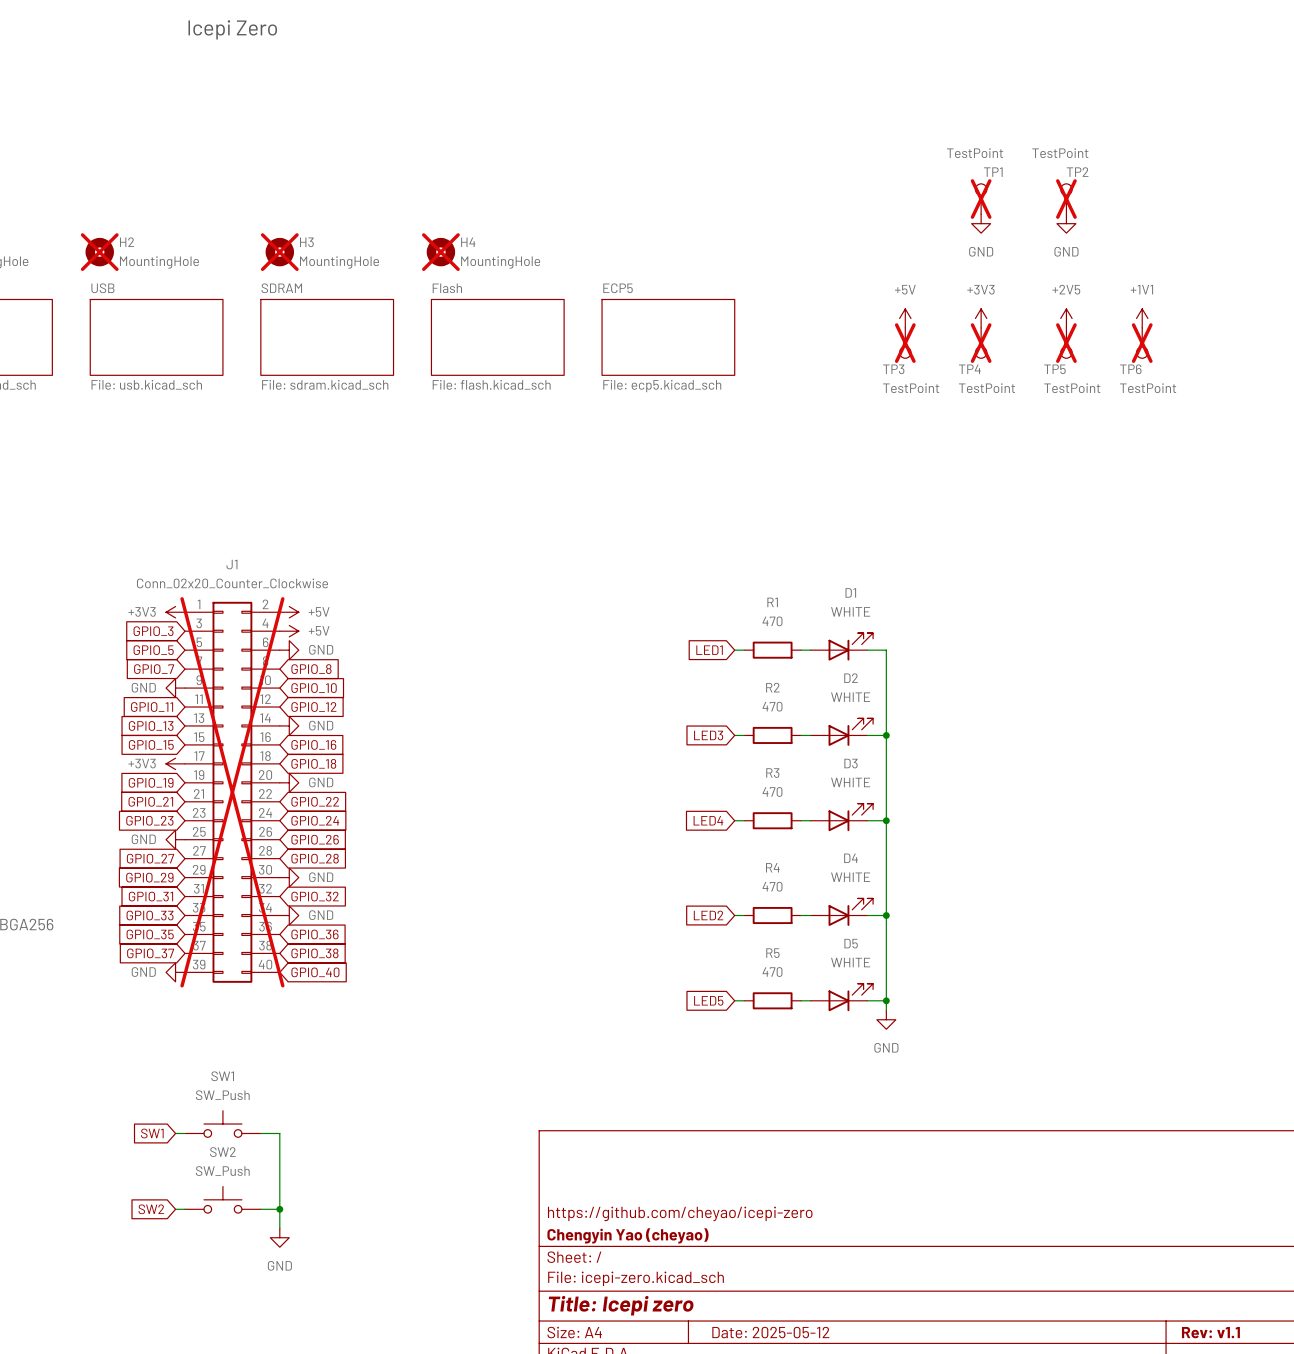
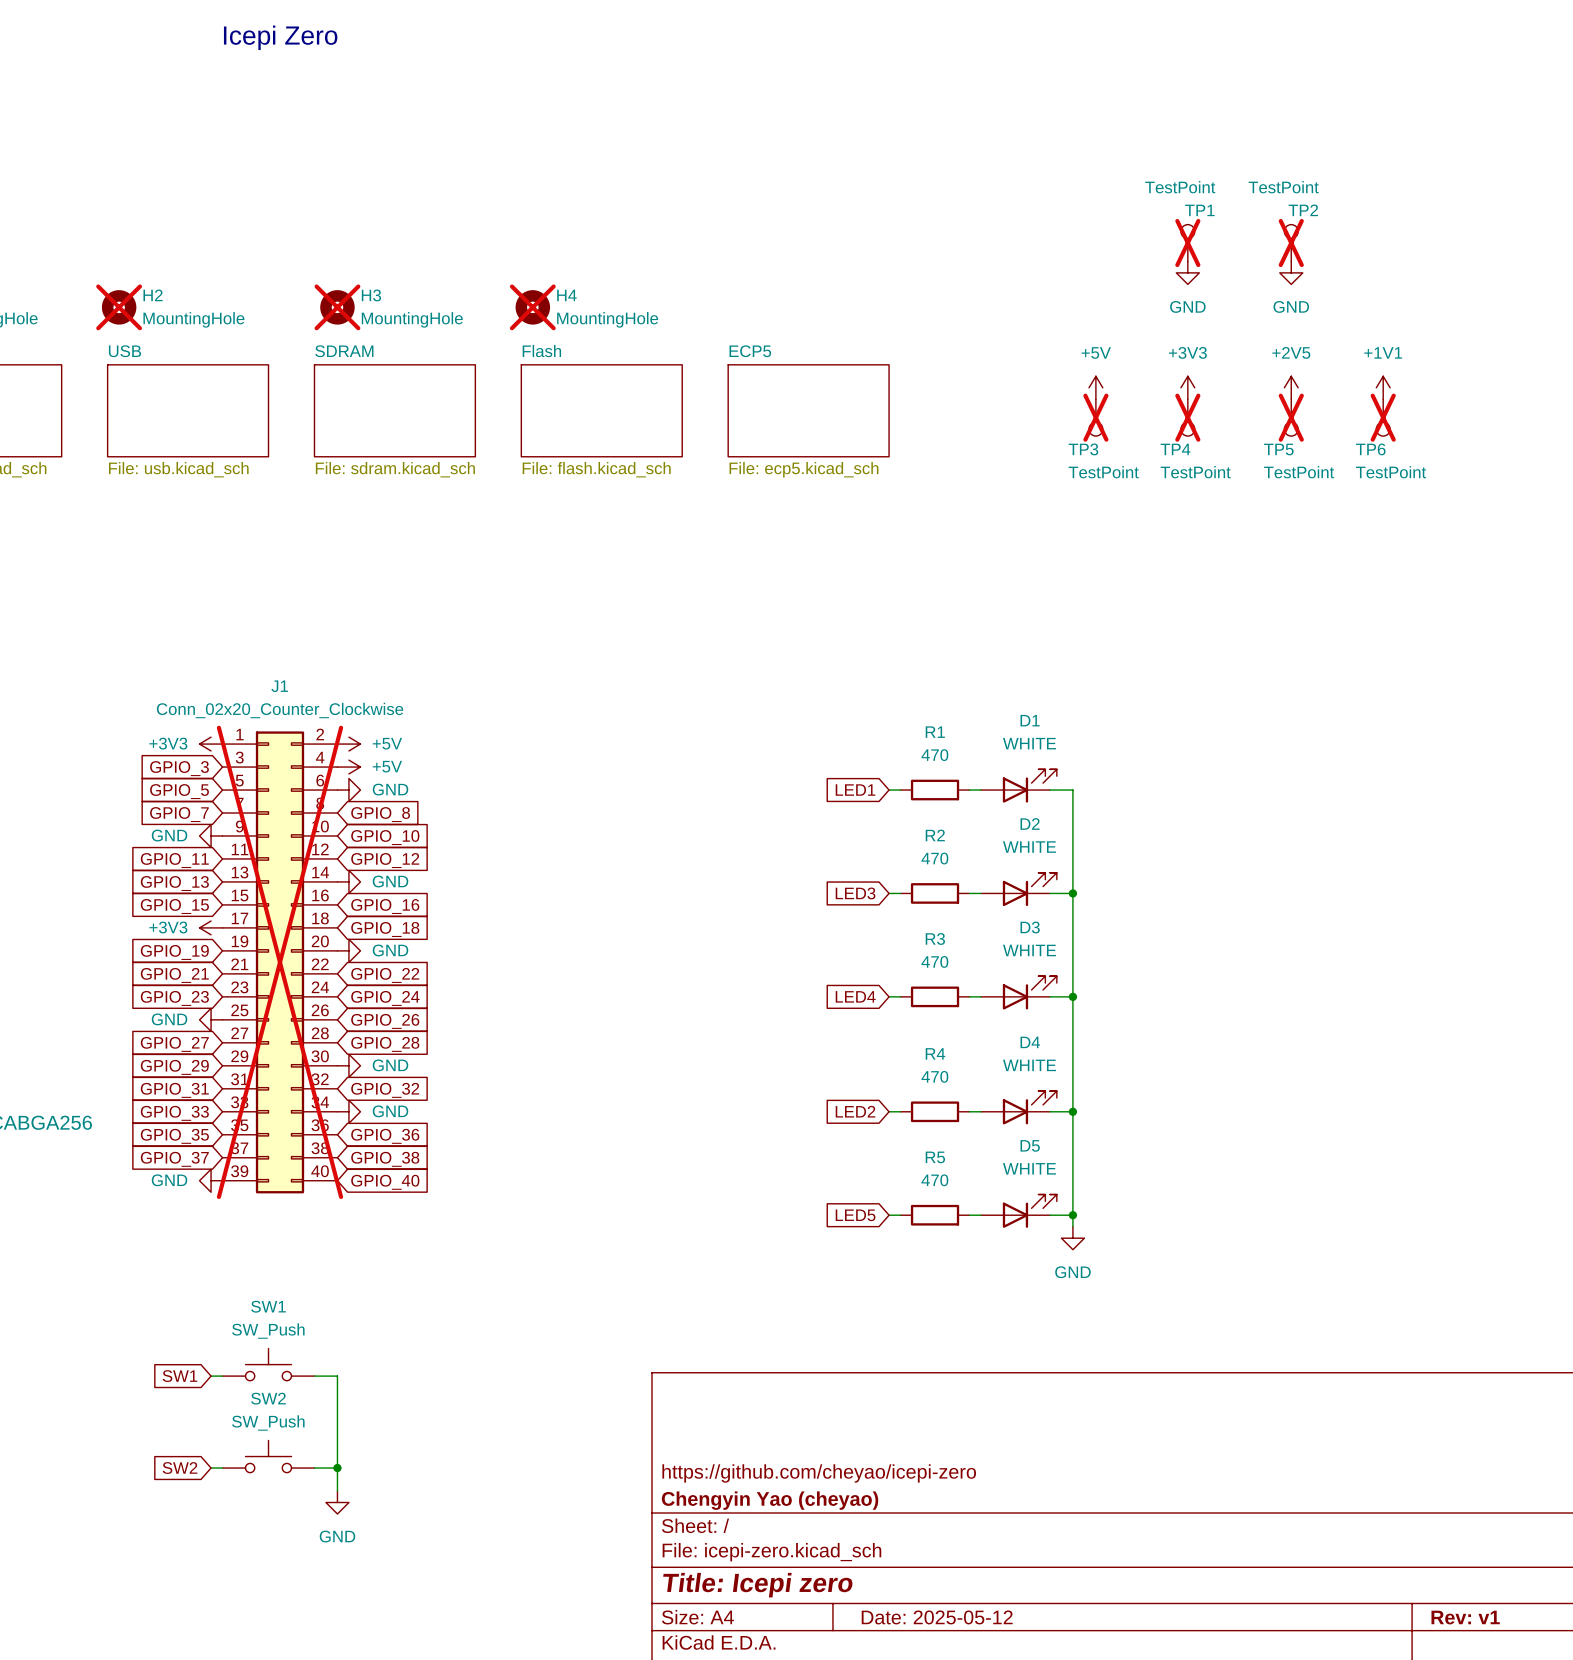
title block: Rev: v1.1 (1210, 1332) -> Rev: v1 (1465, 1617)

